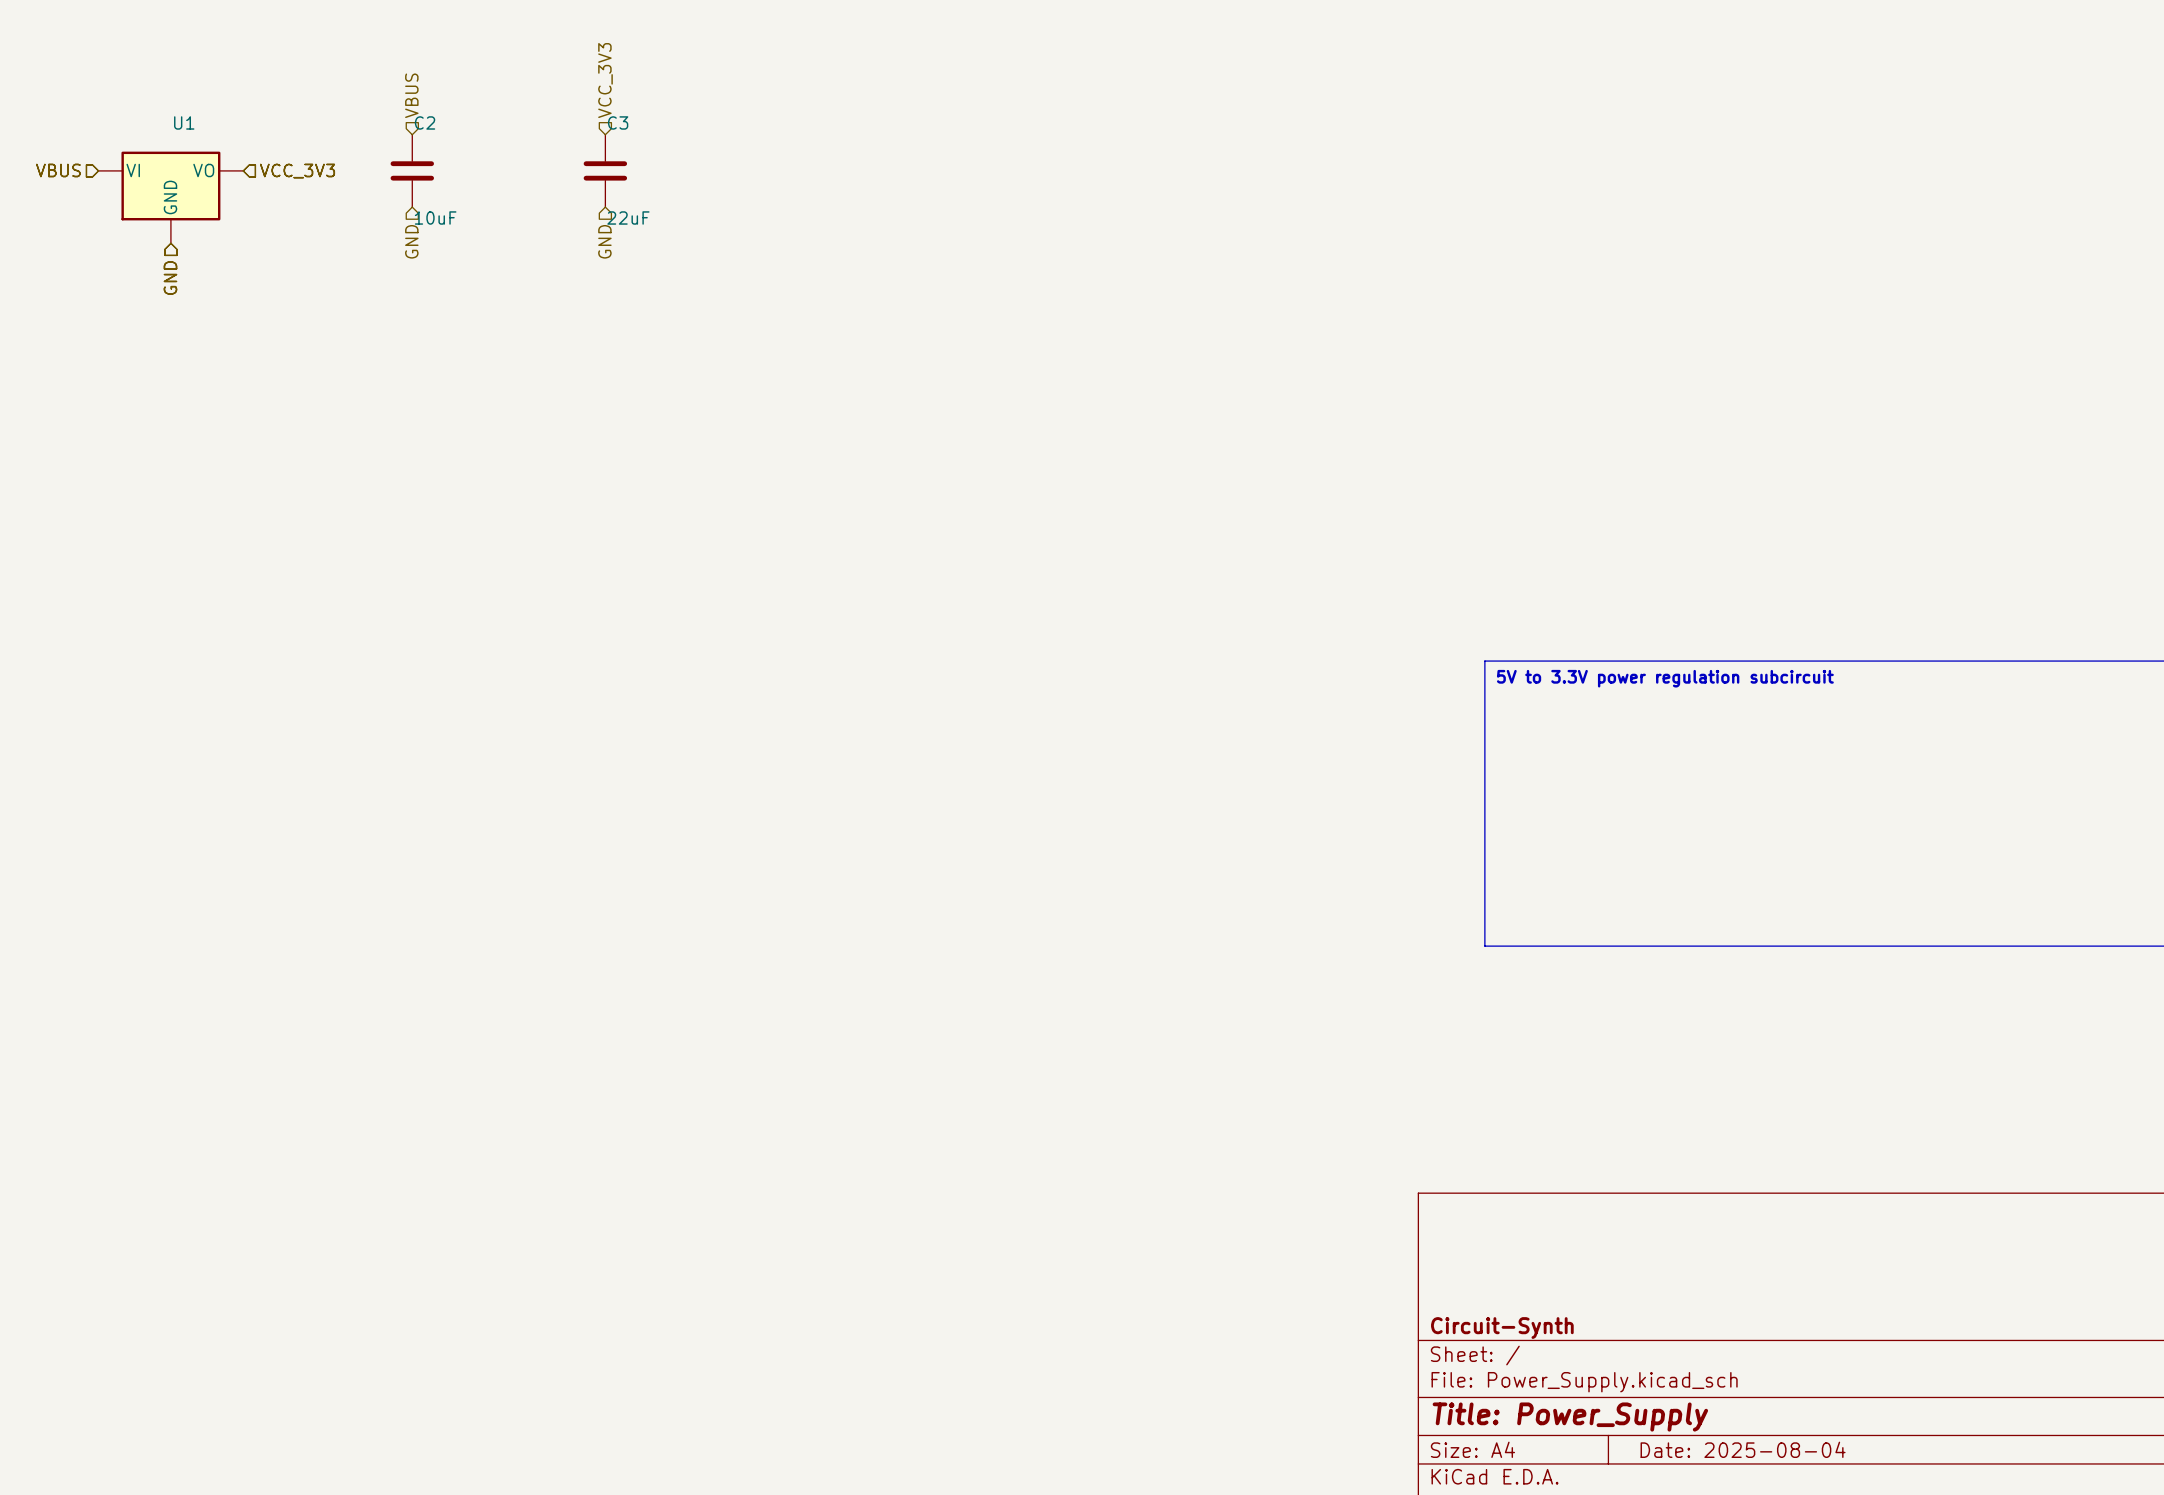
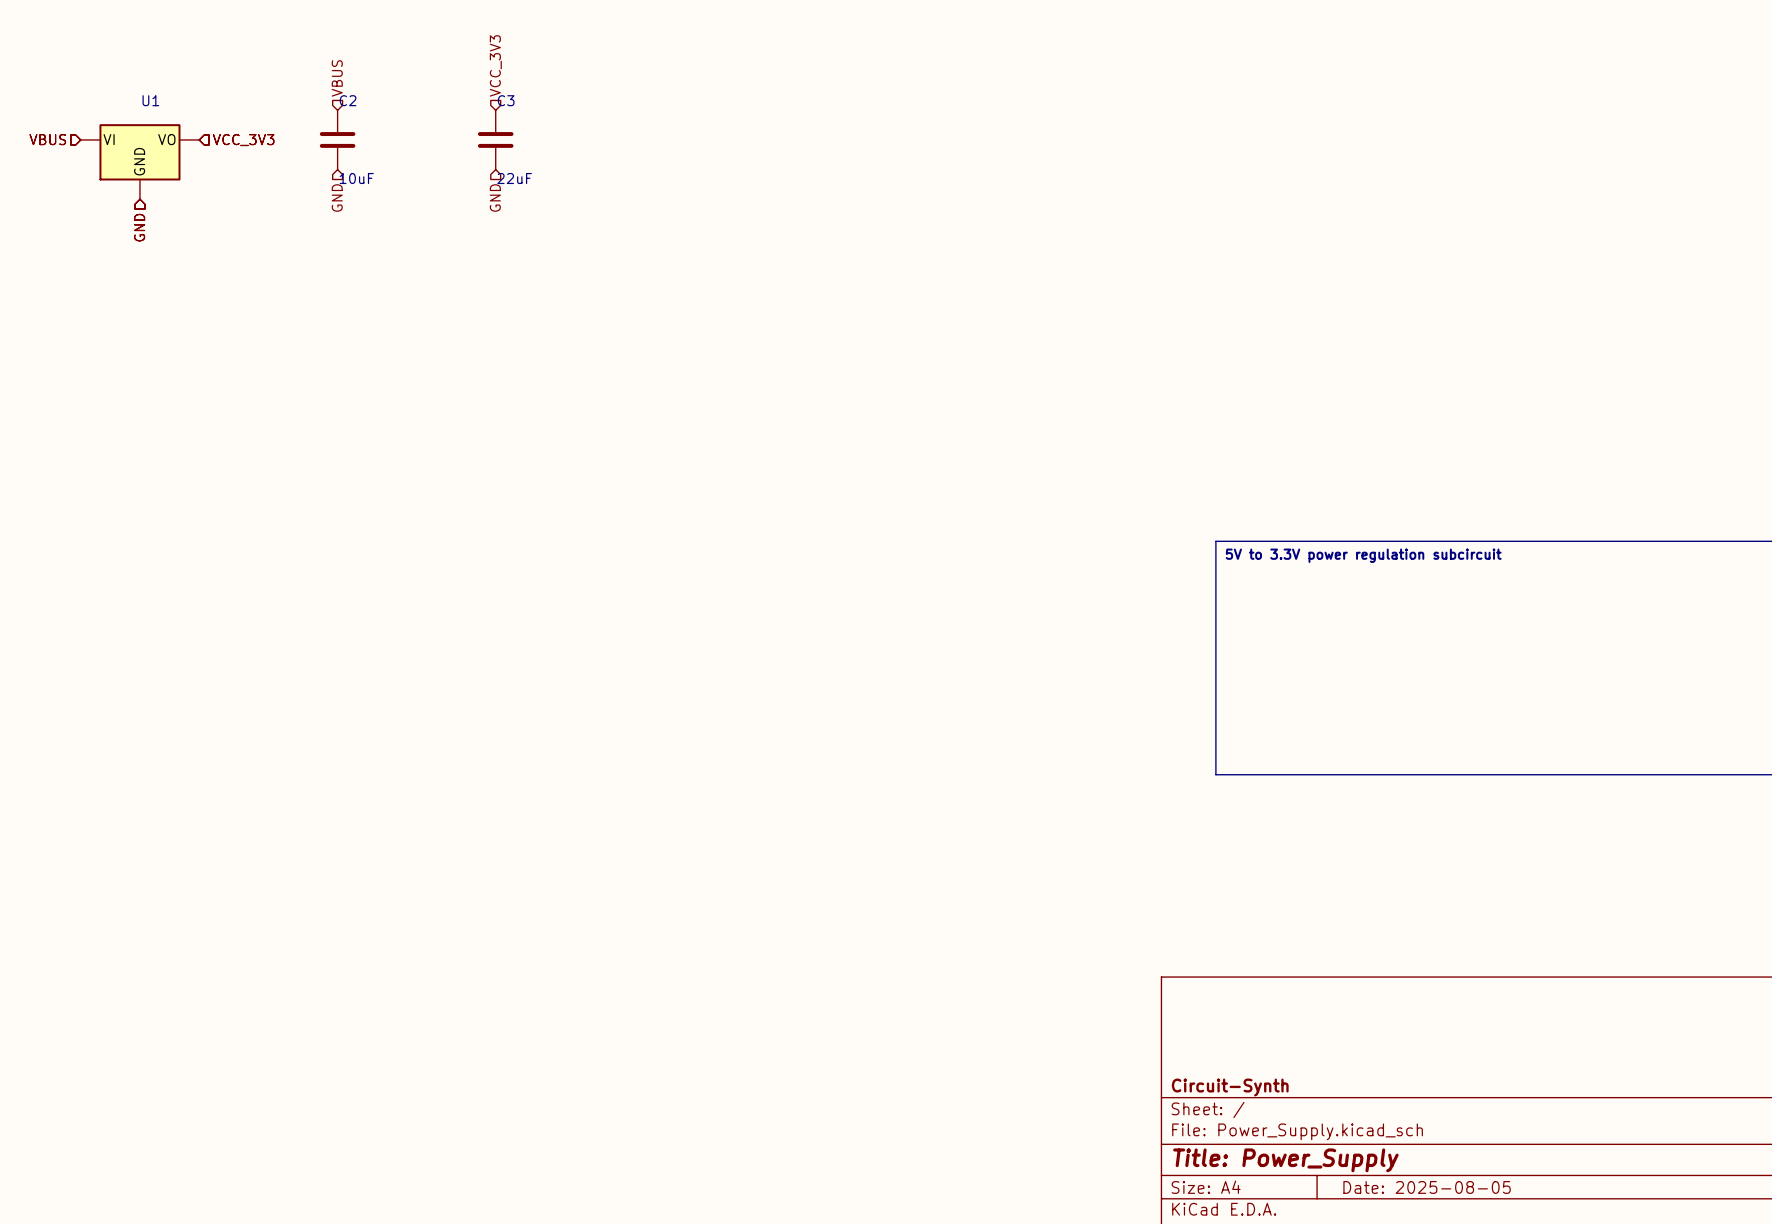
title block: Date: 2025-08-04 (1743, 1449) -> Date: 2025-08-05 (1427, 1187)

